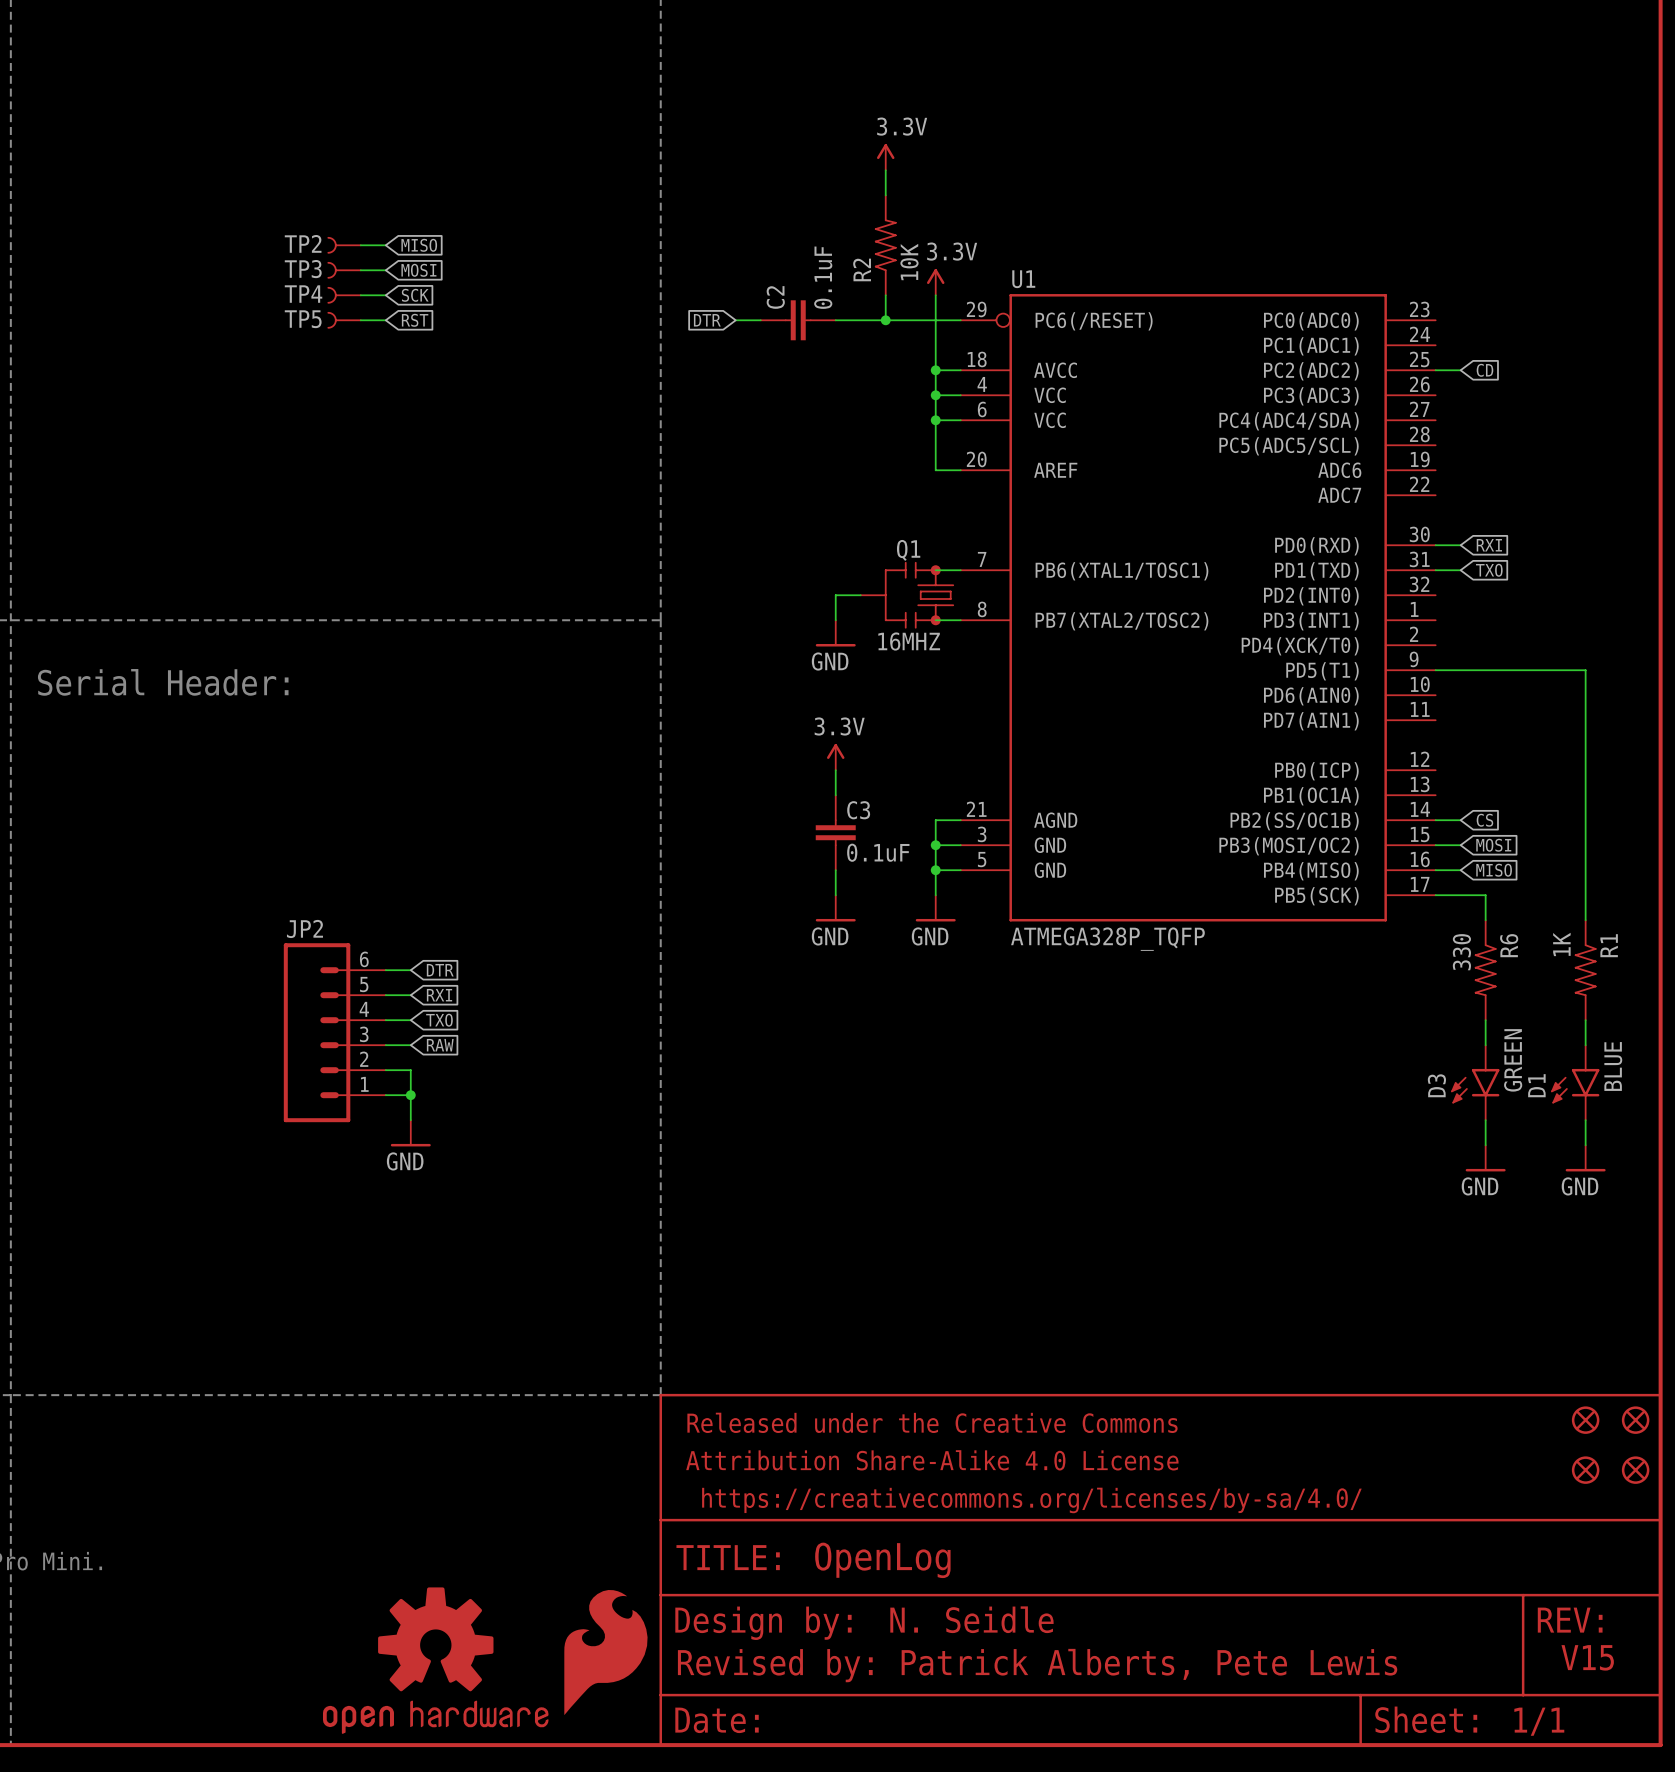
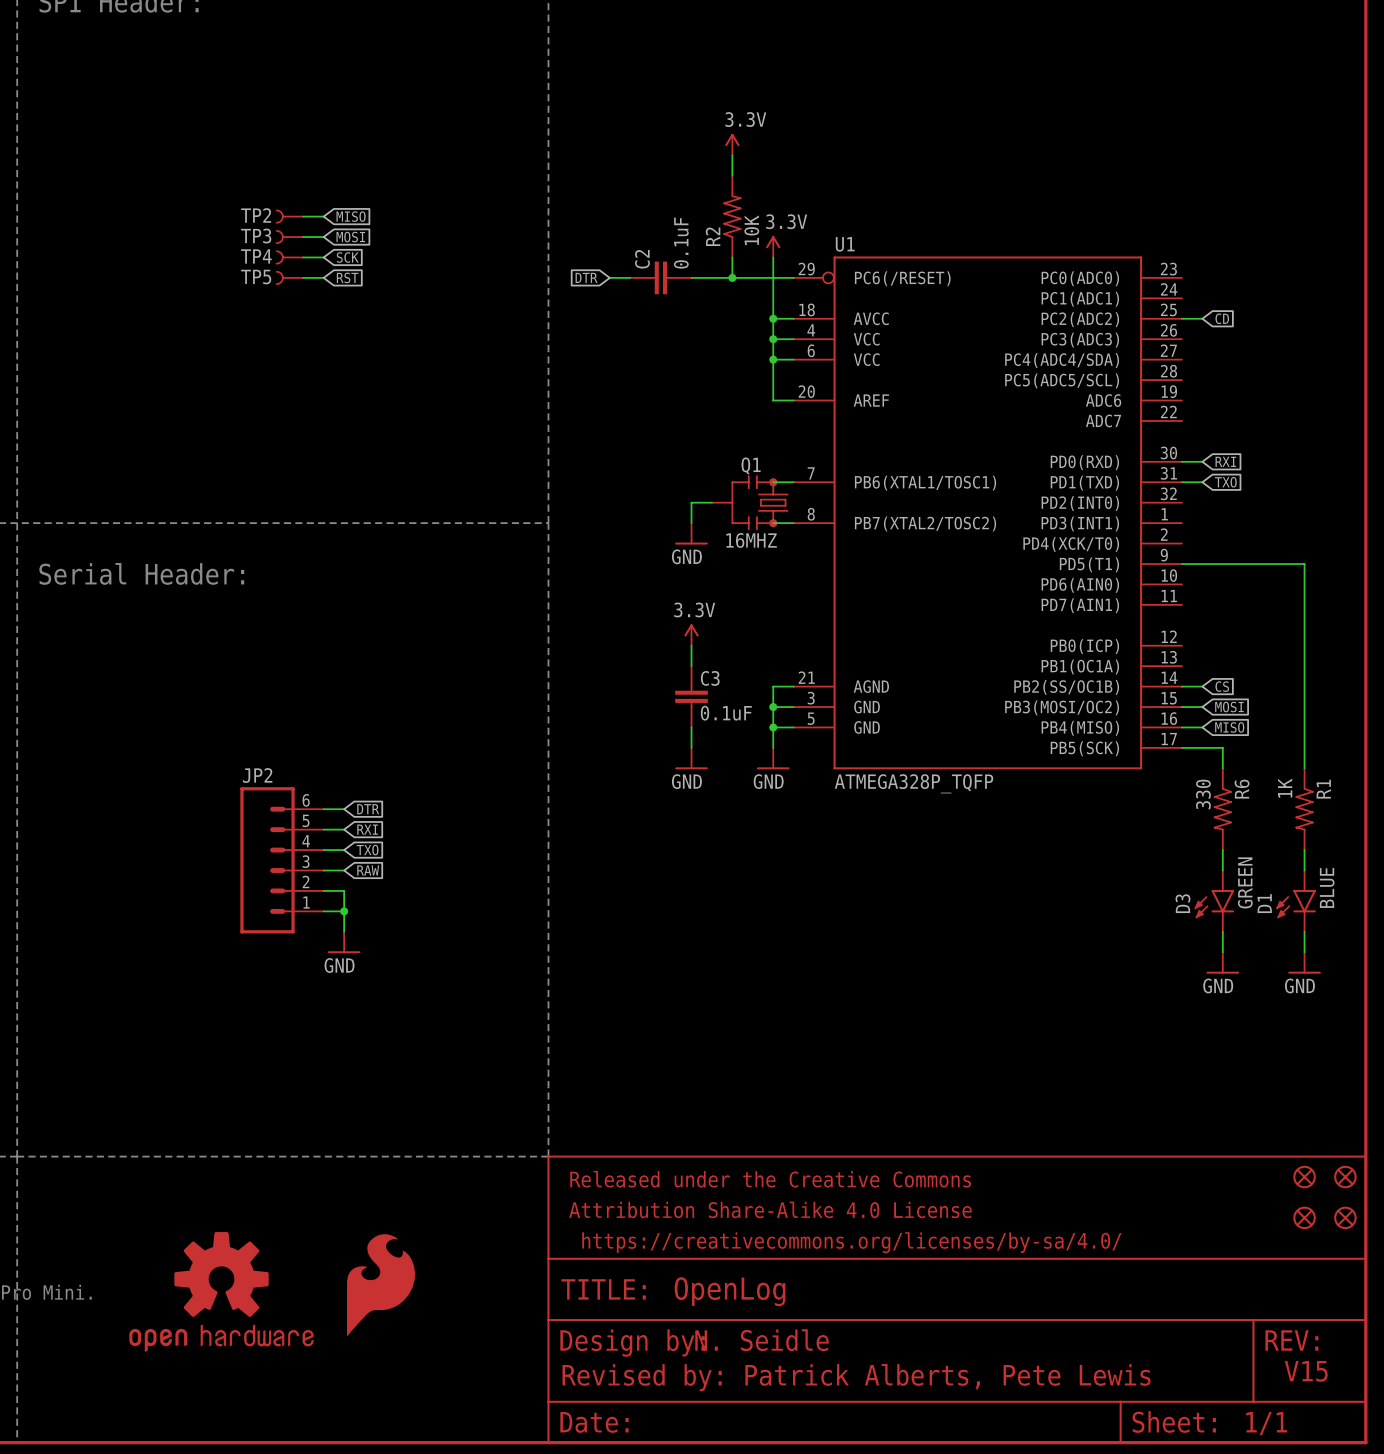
text position: N. Seidle (971, 1619) -> N. Seidle (762, 1340)
part position: (605, 1652) -> (381, 1285)
part position: (435, 1660) -> (221, 1291)

